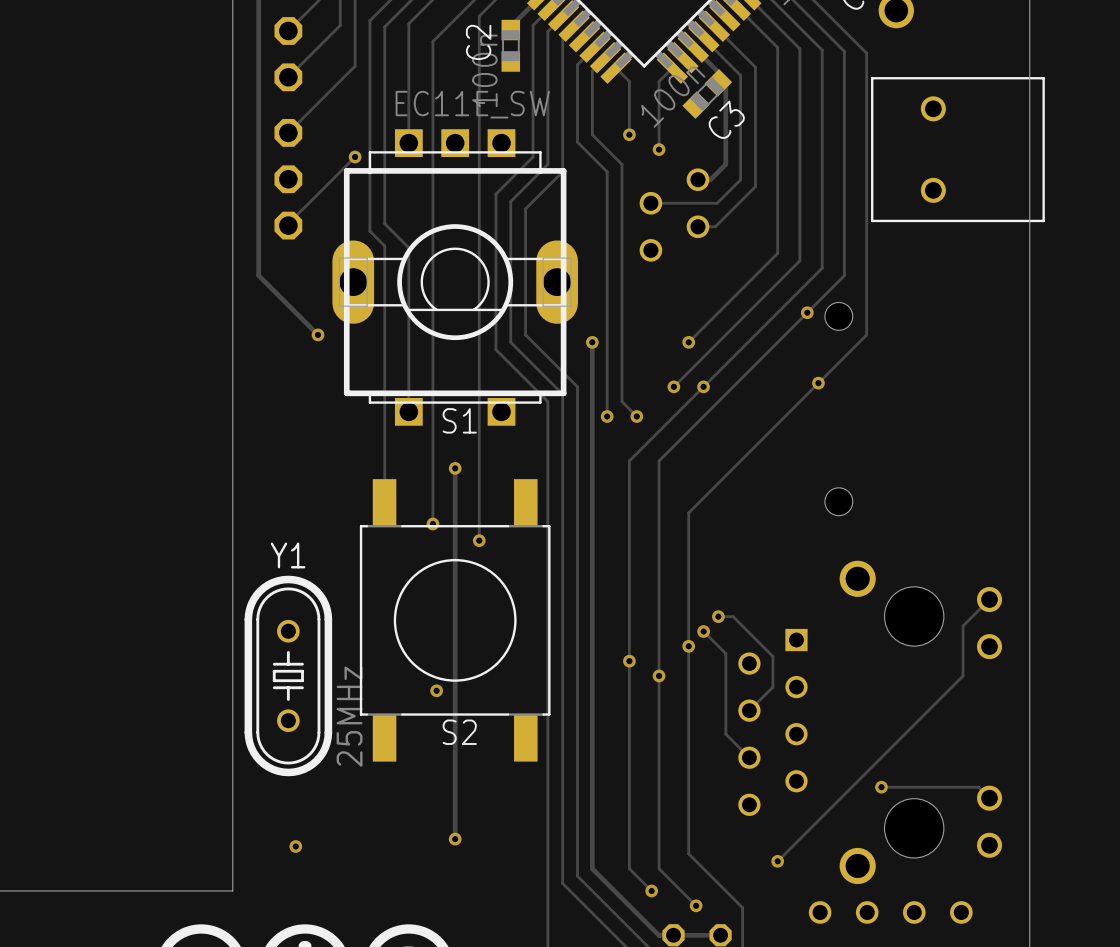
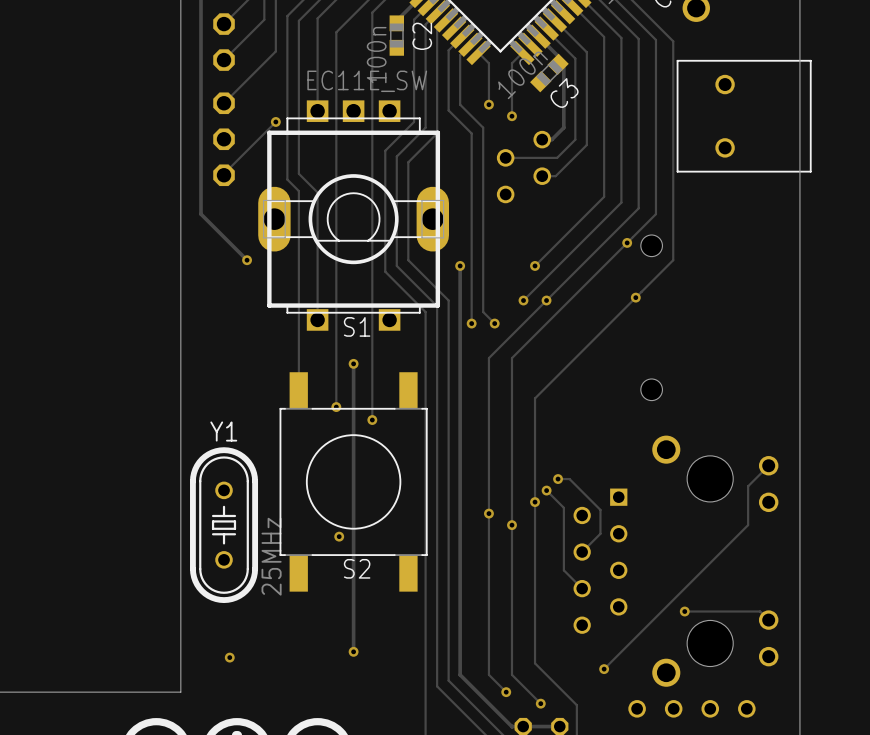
C2 name position: C2 (478, 42) -> C2 (422, 36)

